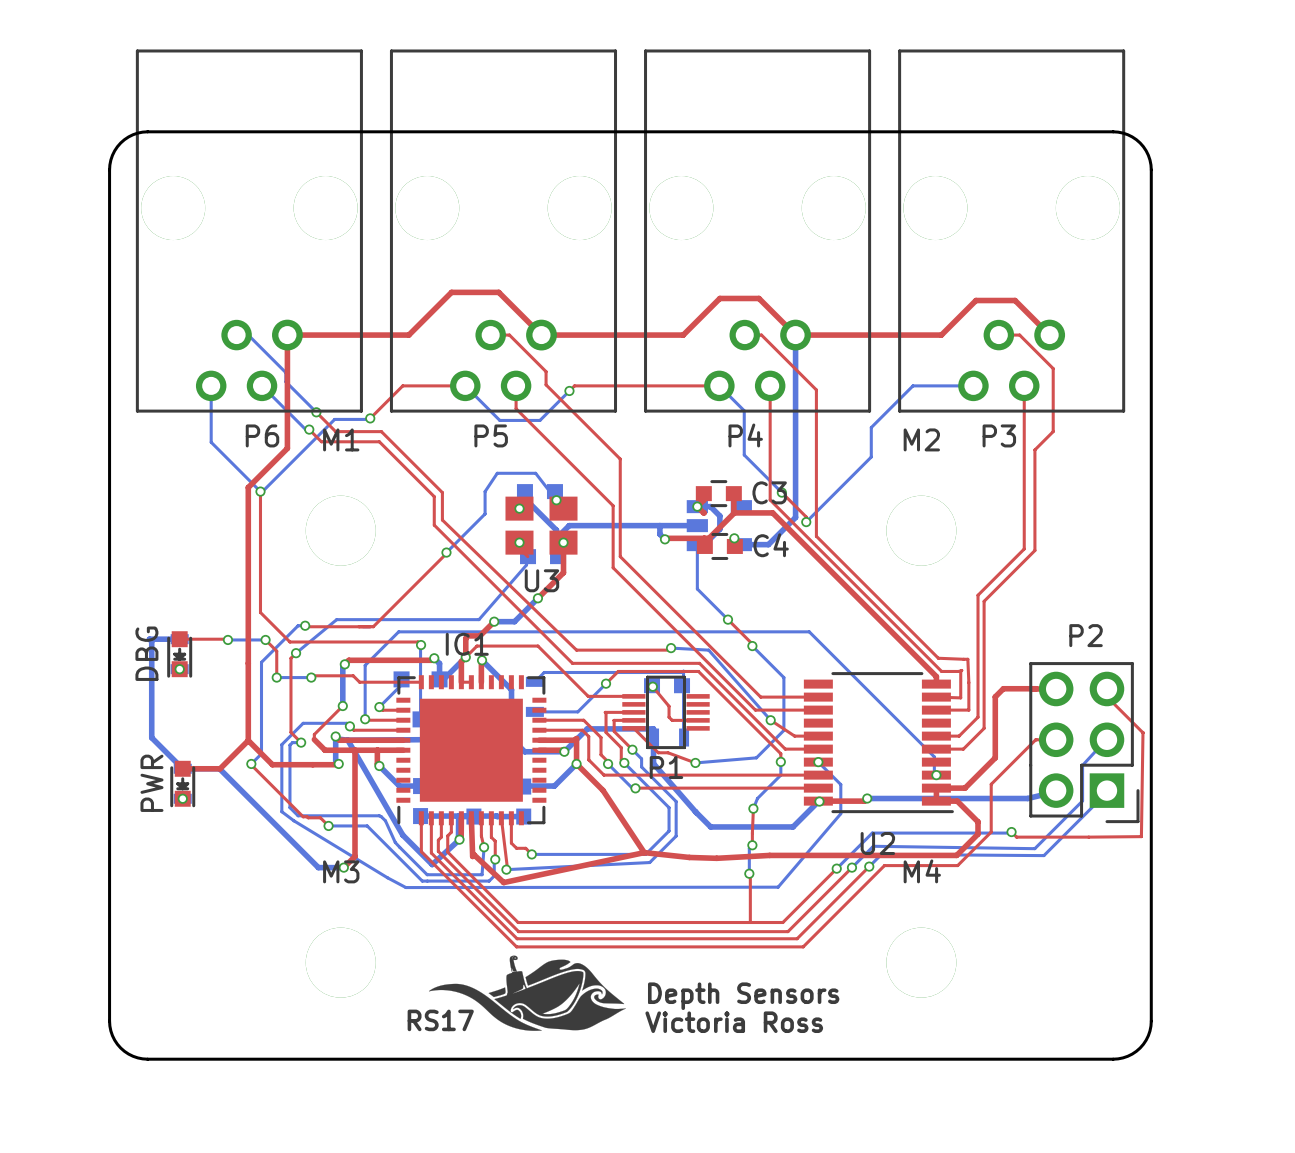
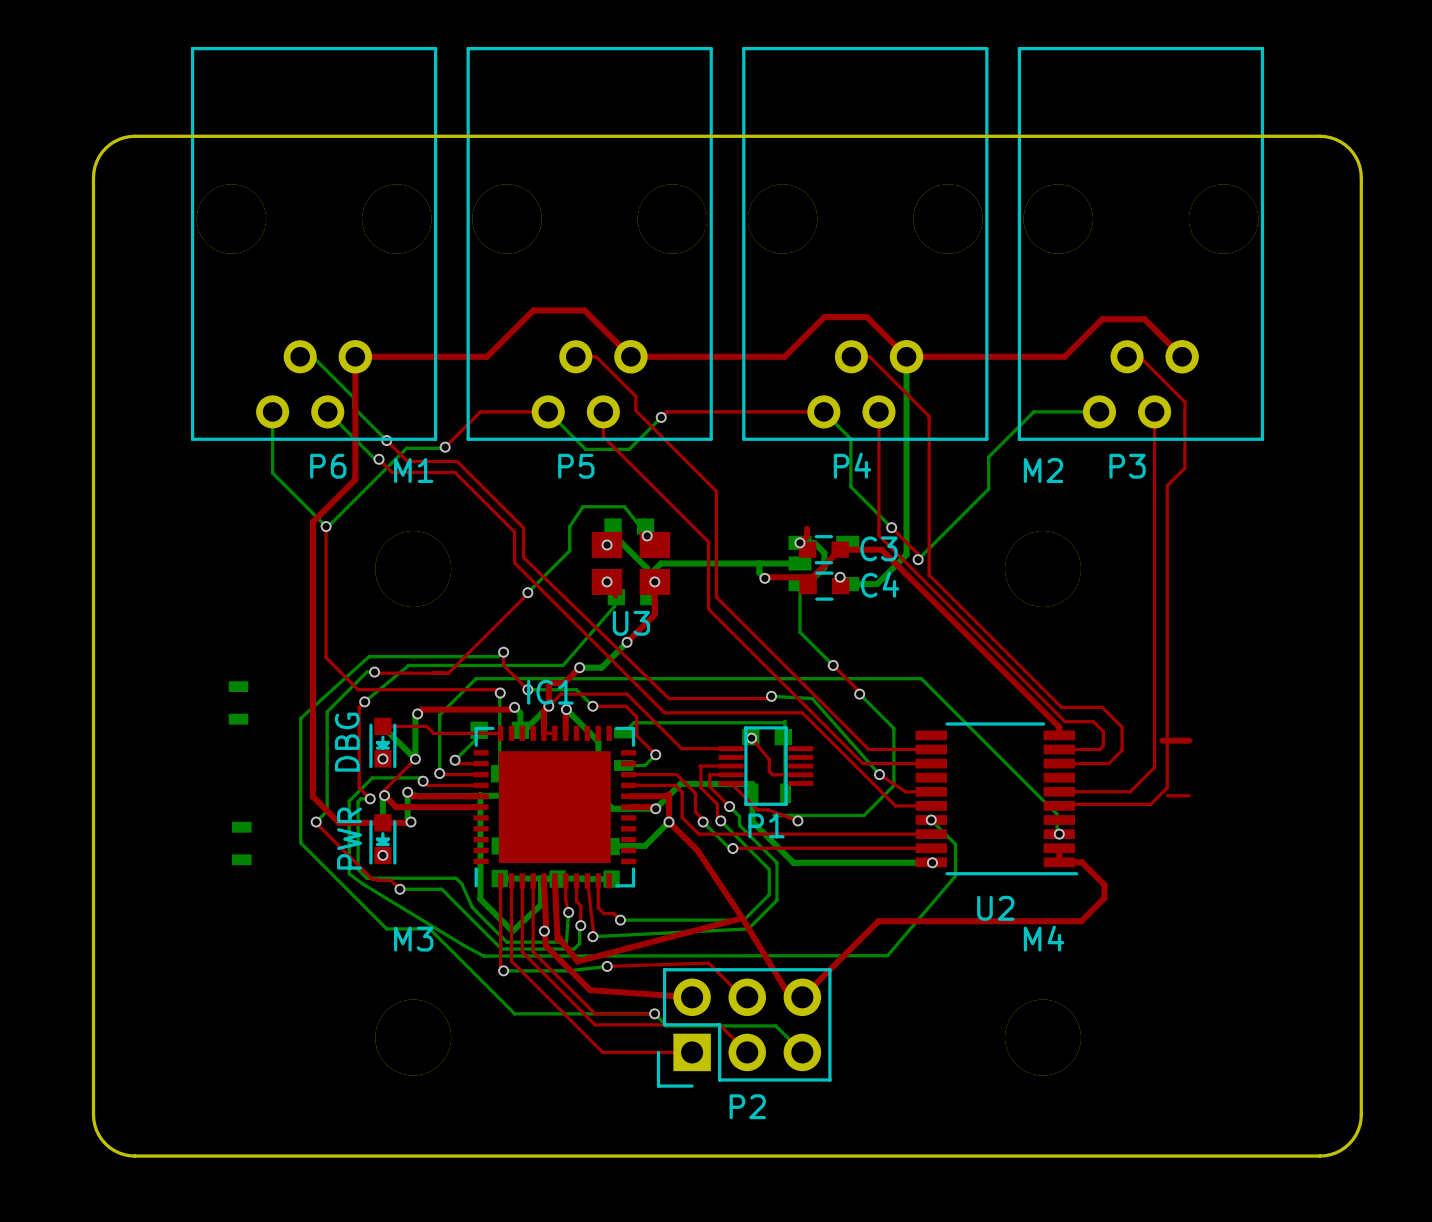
board edge: (147, 131) (133, 134) (120, 142) (112, 155) (109, 169) (109, 1021) (112, 1035) (120, 1048) (133, 1056) (147, 1059) (1113, 1059) (1127, 1056) (1140, 1048) (1148, 1035) (1151, 1021) (1151, 169) (1148, 155) (1140, 142) (1127, 134) (1113, 131) -> (203, 136) (124, 137) (105, 148) (99, 156) (93, 172) (93, 1114) (94, 1125) (102, 1139) (114, 1150) (129, 1155) (1319, 1156) (1335, 1152) (1349, 1143) (1358, 1130) (1361, 1114) (1360, 172) (1355, 156) (1349, 148) (1330, 137) (1251, 136)
top track: (1010, 335) (1019, 335) (1053, 368) (1053, 431) (1034, 449) (1034, 550) (984, 601) (984, 728) (963, 749) (936, 749) -> (1139, 356) (1184, 401) (1184, 468) (1167, 485) (1167, 787) (1150, 804) (1060, 804)
C3 position: (718, 493) -> (823, 549)
top track: (733, 493) (734, 512) -> none
top track: (1024, 549) (978, 595) (978, 717) (959, 736) -> (1154, 588) (1154, 767) (1130, 791) (1083, 791)
bottom track: none -> (503, 652) (498, 656) (369, 656) (300, 718) (300, 842) (386, 928) (429, 928) (514, 1013) (654, 1013) (666, 1025) (775, 1025) (802, 1052)
top track: none -> (503, 652) (503, 665) (527, 689)
via: none -> (503, 652)
P2 name position: P2 (1086, 635) -> P2 (747, 1106)
bottom track: (179, 639) (149, 639) (151, 641) (151, 737) (182, 768) (219, 768) (318, 867) (343, 867) -> none
top track: (179, 639) (227, 639) -> none
bottom track: (227, 639) (265, 639) -> none
via: (227, 639) -> none
top track: (265, 639) (276, 651) (276, 677) -> none
via: (265, 639) -> none
bottom track: none -> (527, 689) (576, 689) (592, 706)
via: none -> (527, 689)
DBG position: (179, 654) -> (382, 742)
top track: none -> (592, 706) (625, 706) (636, 717) (636, 735) (655, 754)
via: none -> (592, 706)
top track: (938, 658) (967, 659) (968, 710) -> (1061, 707) (1102, 707) (1122, 727) (1122, 750) (1108, 763) (1094, 763)
via: (179, 669) -> none
top track: (958, 671) (961, 670) (960, 697) (936, 697) -> (1083, 721) (1093, 721) (1103, 731) (1103, 745) (1099, 749) (1059, 749)
bottom track: none -> (382, 726) (415, 759)
bottom track: (276, 677) (311, 677) -> none
via: (276, 677) -> none
via: (311, 677) -> none
bottom track: (606, 683) (577, 711) (554, 711) -> (655, 754) (644, 765)
top track: (606, 683) (618, 671) (698, 671) (780, 753) (780, 761) -> none
via position: (606, 683) -> (655, 754)
top track: (1035, 688) (1003, 688) (995, 696) (995, 757) (965, 788) (936, 788) -> none
top track: (1106, 688) (1106, 696) (1142, 732) -> none
via: none -> (382, 758)
top track: (1142, 732) (1141, 836) (1016, 837) (1011, 832) -> none
bottom track: none -> (384, 795) (382, 797) (382, 822)
via: none -> (384, 795)
top track: (1035, 739) (991, 784) (991, 832) (957, 865) (884, 865) (803, 946) (516, 946) (421, 851) -> (503, 970) (500, 967) (500, 917)
top track: (248, 740) (220, 768) (182, 768) -> none
bottom track: (347, 740) (402, 835) -> (480, 795) (480, 899)
bottom track: (1105, 740) (1082, 765) (1082, 800) (1034, 848) (873, 846) (851, 867) -> none
P2 rotation: 0° (1084, 742) -> 90° clockwise (744, 1027)
P2 position: (1084, 742) -> (744, 1027)
top track: (355, 750) (355, 856) (343, 867) -> none
top track: (377, 750) (377, 763) (379, 765) -> none
bottom track: (756, 757) (695, 762) -> (864, 815) (773, 815)
bottom track: (780, 761) (780, 775) (757, 798) (753, 808) -> none
via: (780, 761) -> none
bottom track: (653, 763) (696, 813) -> (752, 821) (793, 862) (931, 862)
bottom track: (379, 765) (399, 786) (420, 786) -> none
via: (379, 765) -> none
PWR position: (182, 784) -> (382, 839)
bottom track: (1056, 791) (1027, 798) (867, 798) -> none
bottom track: (1107, 791) (1043, 855) (881, 854) (869, 866) -> none
via: none -> (382, 855)
via: (182, 798) -> none
top track: (867, 798) (864, 801) (819, 801) -> none
via: (867, 798) -> none
bottom track: (819, 801) (793, 826) (710, 826) (695, 811) -> none
top track: (753, 808) (752, 845) -> none
via: (753, 808) -> none
top track: (461, 818) (461, 837) (459, 839) -> (544, 880) (546, 946) (590, 990) (692, 997)
top track: (471, 818) (472, 856) (474, 854) (503, 882) (644, 852) (716, 858) (769, 855) -> (554, 880) (557, 939) (559, 938) (577, 961) (742, 918) (790, 997) (802, 997) (878, 921)
top track: (451, 832) (447, 835) (447, 852) (518, 922) (782, 922) (836, 868) -> (533, 896) (533, 951) (595, 1013) (654, 1013)
bottom track: (1011, 832) (872, 833) (836, 868) -> none
via: (1011, 832) -> none
top track: (441, 837) (438, 840) (438, 851) (518, 931) (787, 931) (851, 867) -> (522, 901) (522, 952) (595, 1024) (719, 1024) (747, 1052)
via position: (459, 839) -> (544, 931)
bottom track: (752, 845) (749, 848) (749, 873) -> none
via: (752, 845) -> none
top track: (431, 853) (517, 938) (797, 938) (869, 866) -> (511, 918) (511, 961) (602, 1052) (692, 1052)
via: (869, 866) -> none
via: (343, 867) -> none
via: (851, 867) -> none
via: (836, 868) -> none
top track: (749, 873) (750, 922) -> none
via: (749, 873) -> none
bottom track: none -> (607, 966) (568, 970) (503, 970)
top track: none -> (607, 966) (708, 963) (742, 997) (747, 997)
via: none -> (607, 966)
via: none -> (503, 970)
via: none -> (654, 1013)
drawing: [428, 955, 626, 1031] -> none
text: Depth Sensors (743, 996) -> none
text: RS17 (440, 1020) -> none
text: Victoria Ross (734, 1022) -> none

